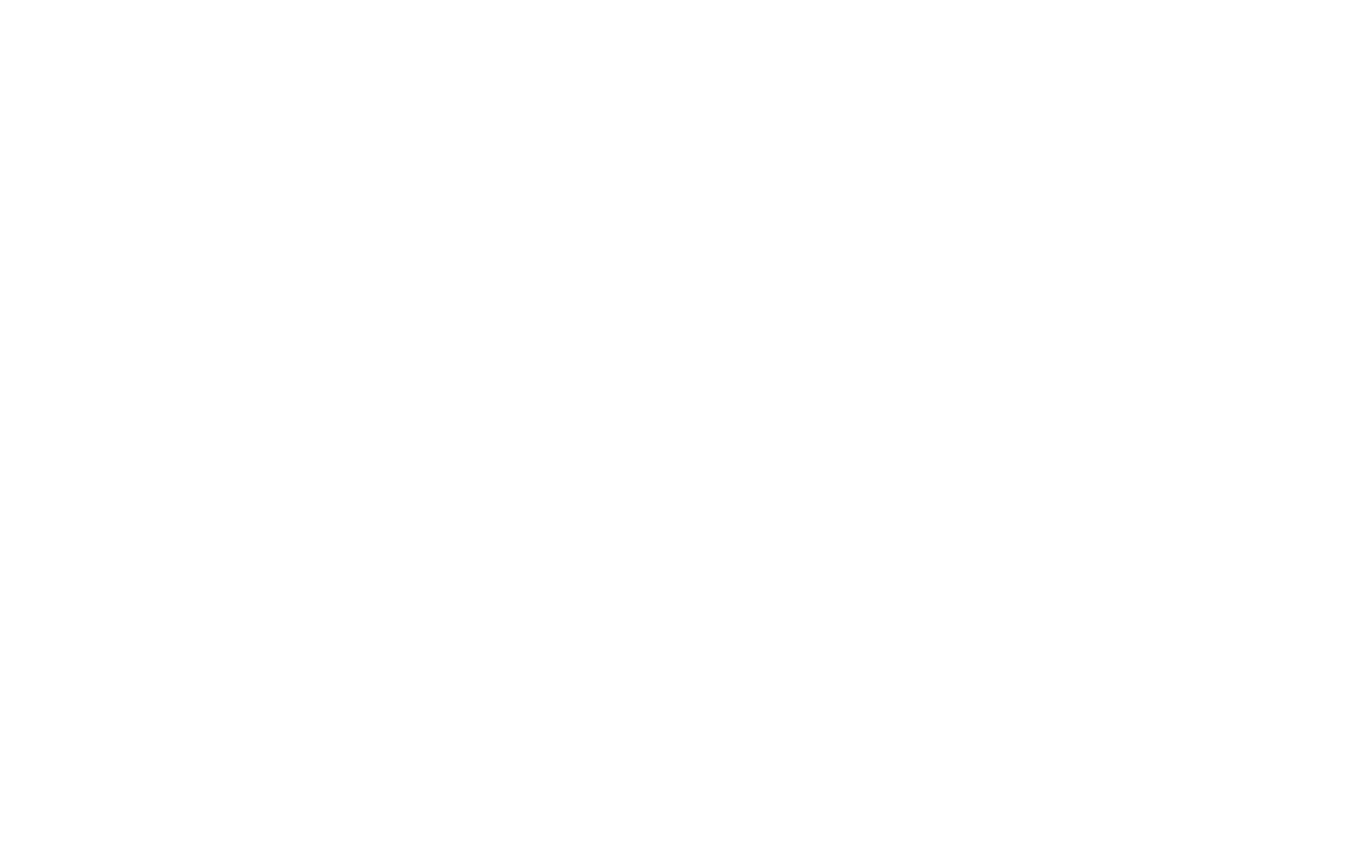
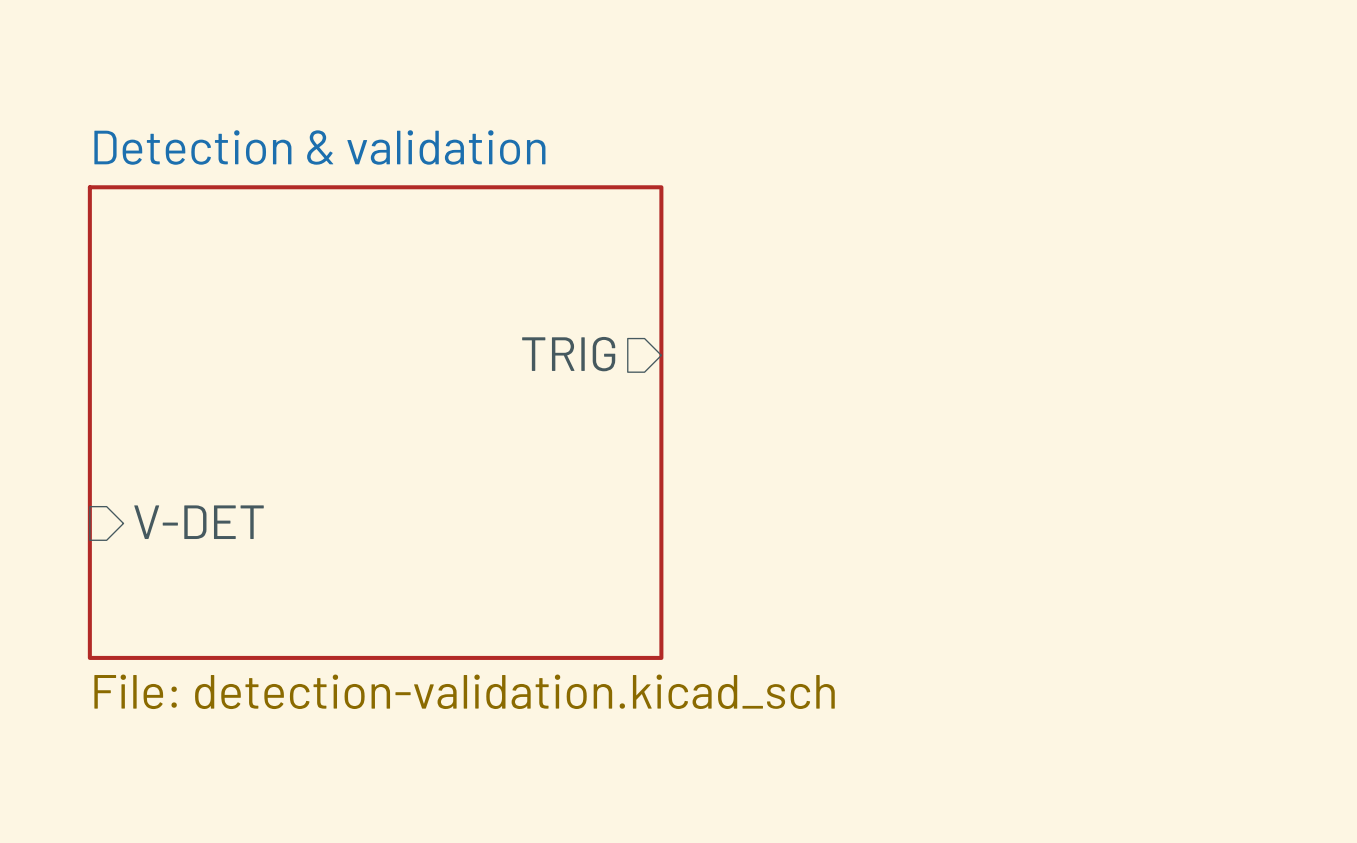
sheet pin: none -> TRIG (568, 354)
sheet Detection & validation: none -> File: detection-validation.kicad_sch (375, 422)
sheet pin: none -> V-DET (199, 522)

